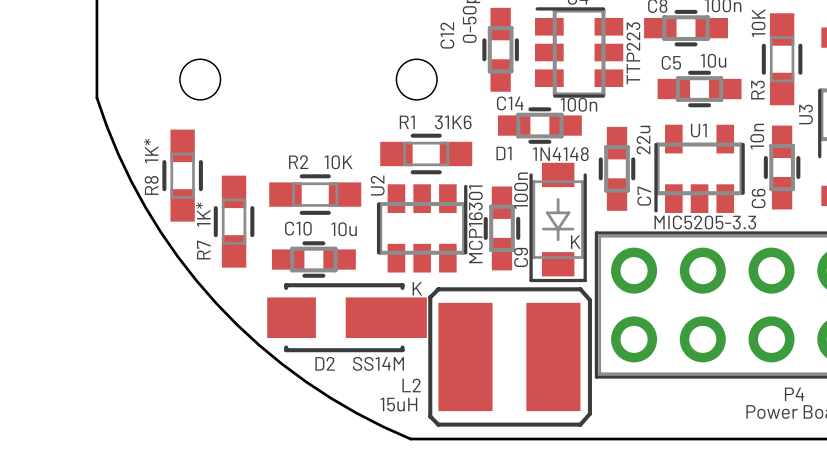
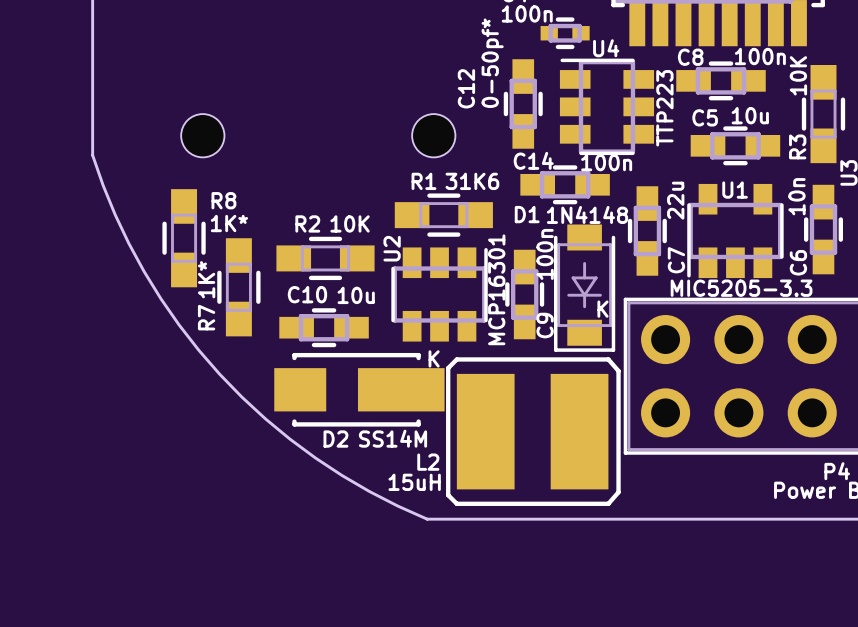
R8 value rotation: 0° (151, 151) -> 90° clockwise (229, 223)
R8 value position: 1K* (151, 151) -> 1K* (229, 223)
R8 name rotation: 0° (151, 185) -> 90° clockwise (223, 200)
R8 name position: R8 (151, 185) -> R8 (223, 200)

